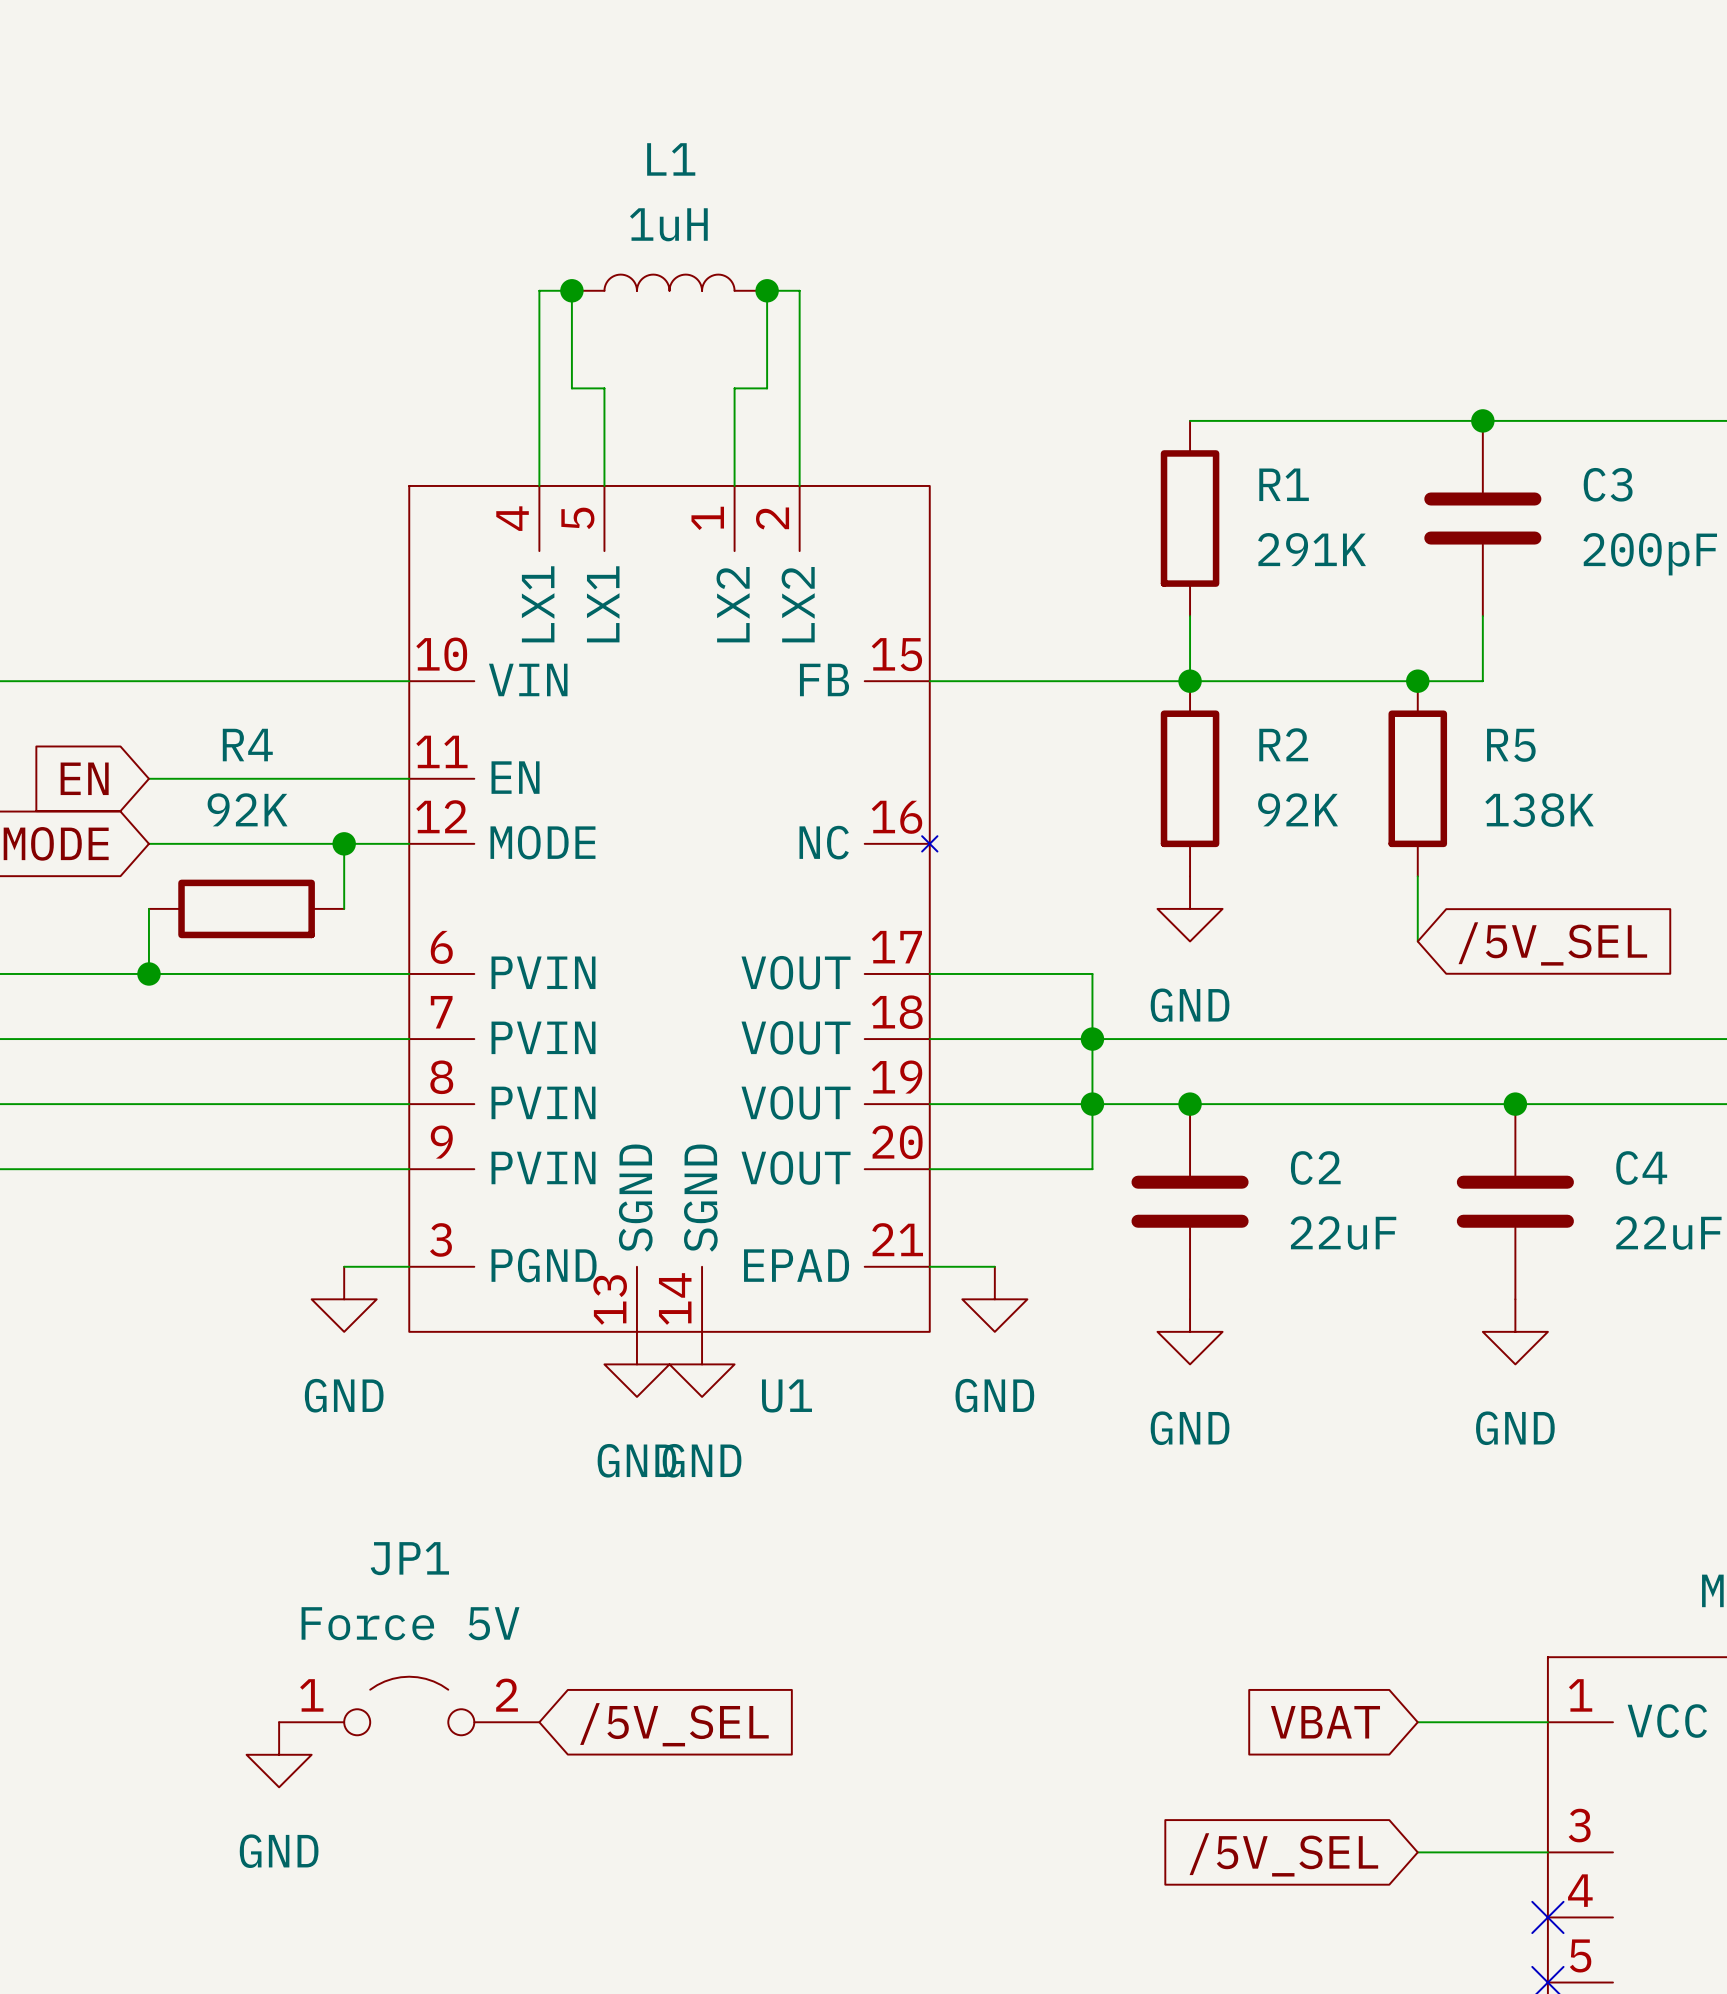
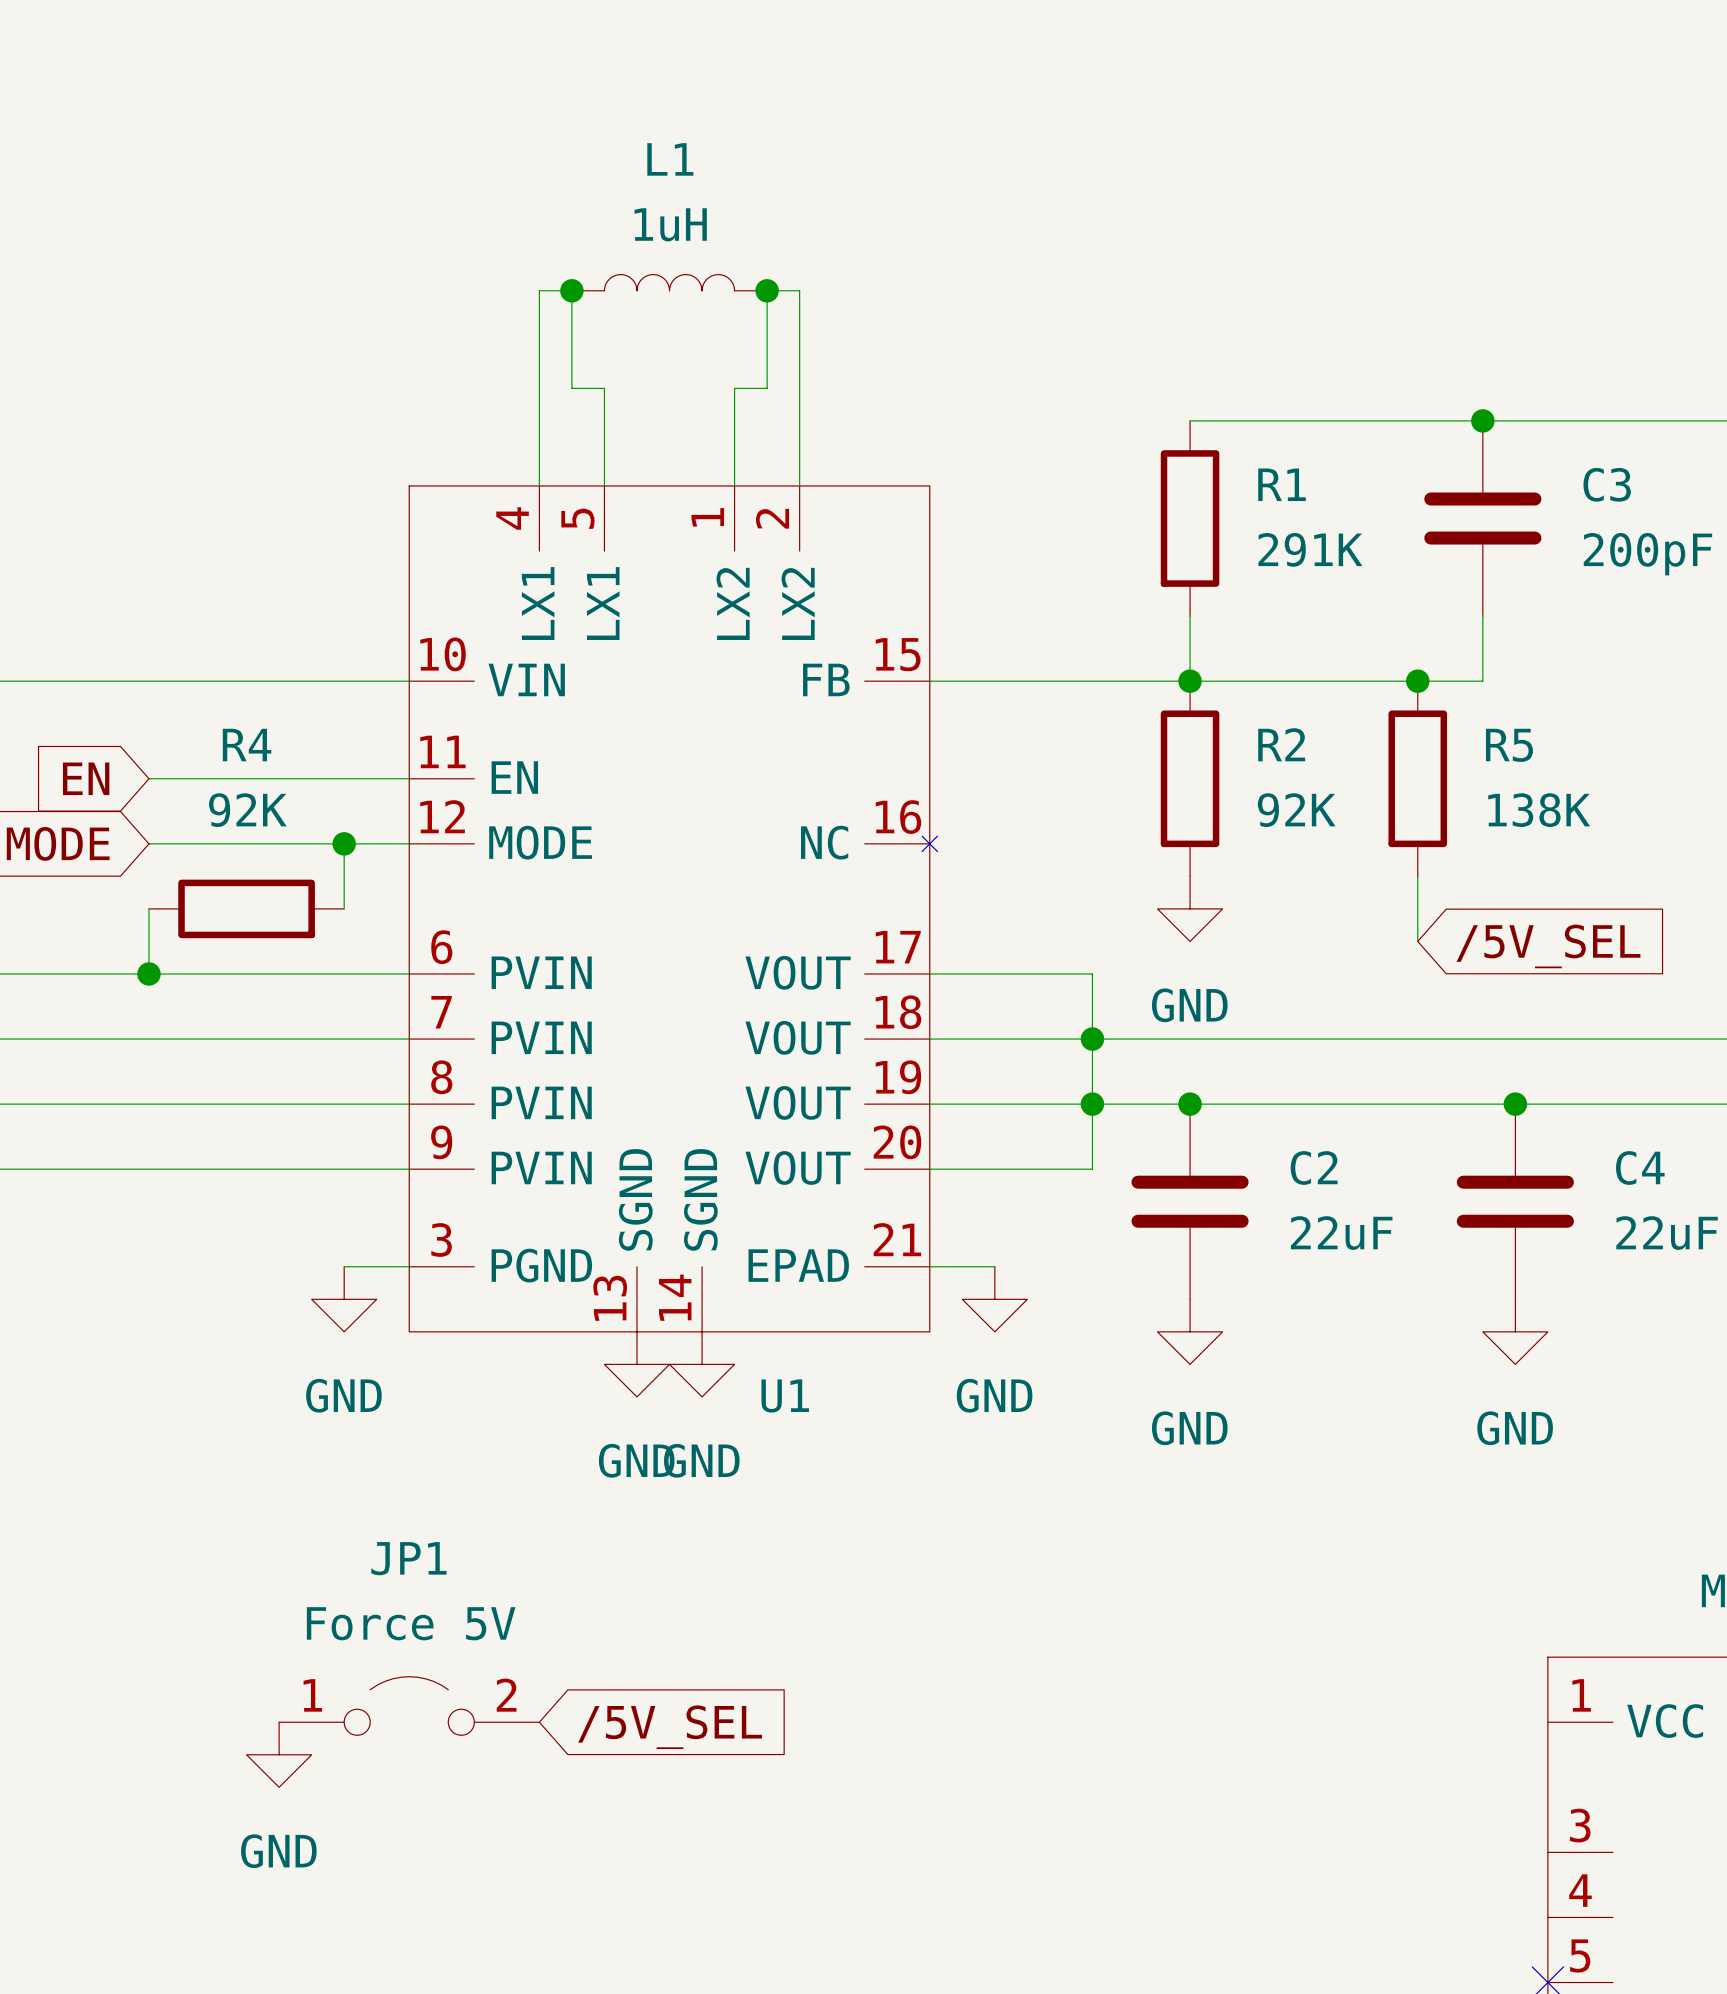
global label: VBAT (1325, 1722) -> none
wire: (1417, 1722) (1547, 1722) -> none
wire: (1417, 1852) (1547, 1852) -> none
global label: /5V_SEL (1283, 1854) -> none
no-connect mark: (1547, 1917) -> none

